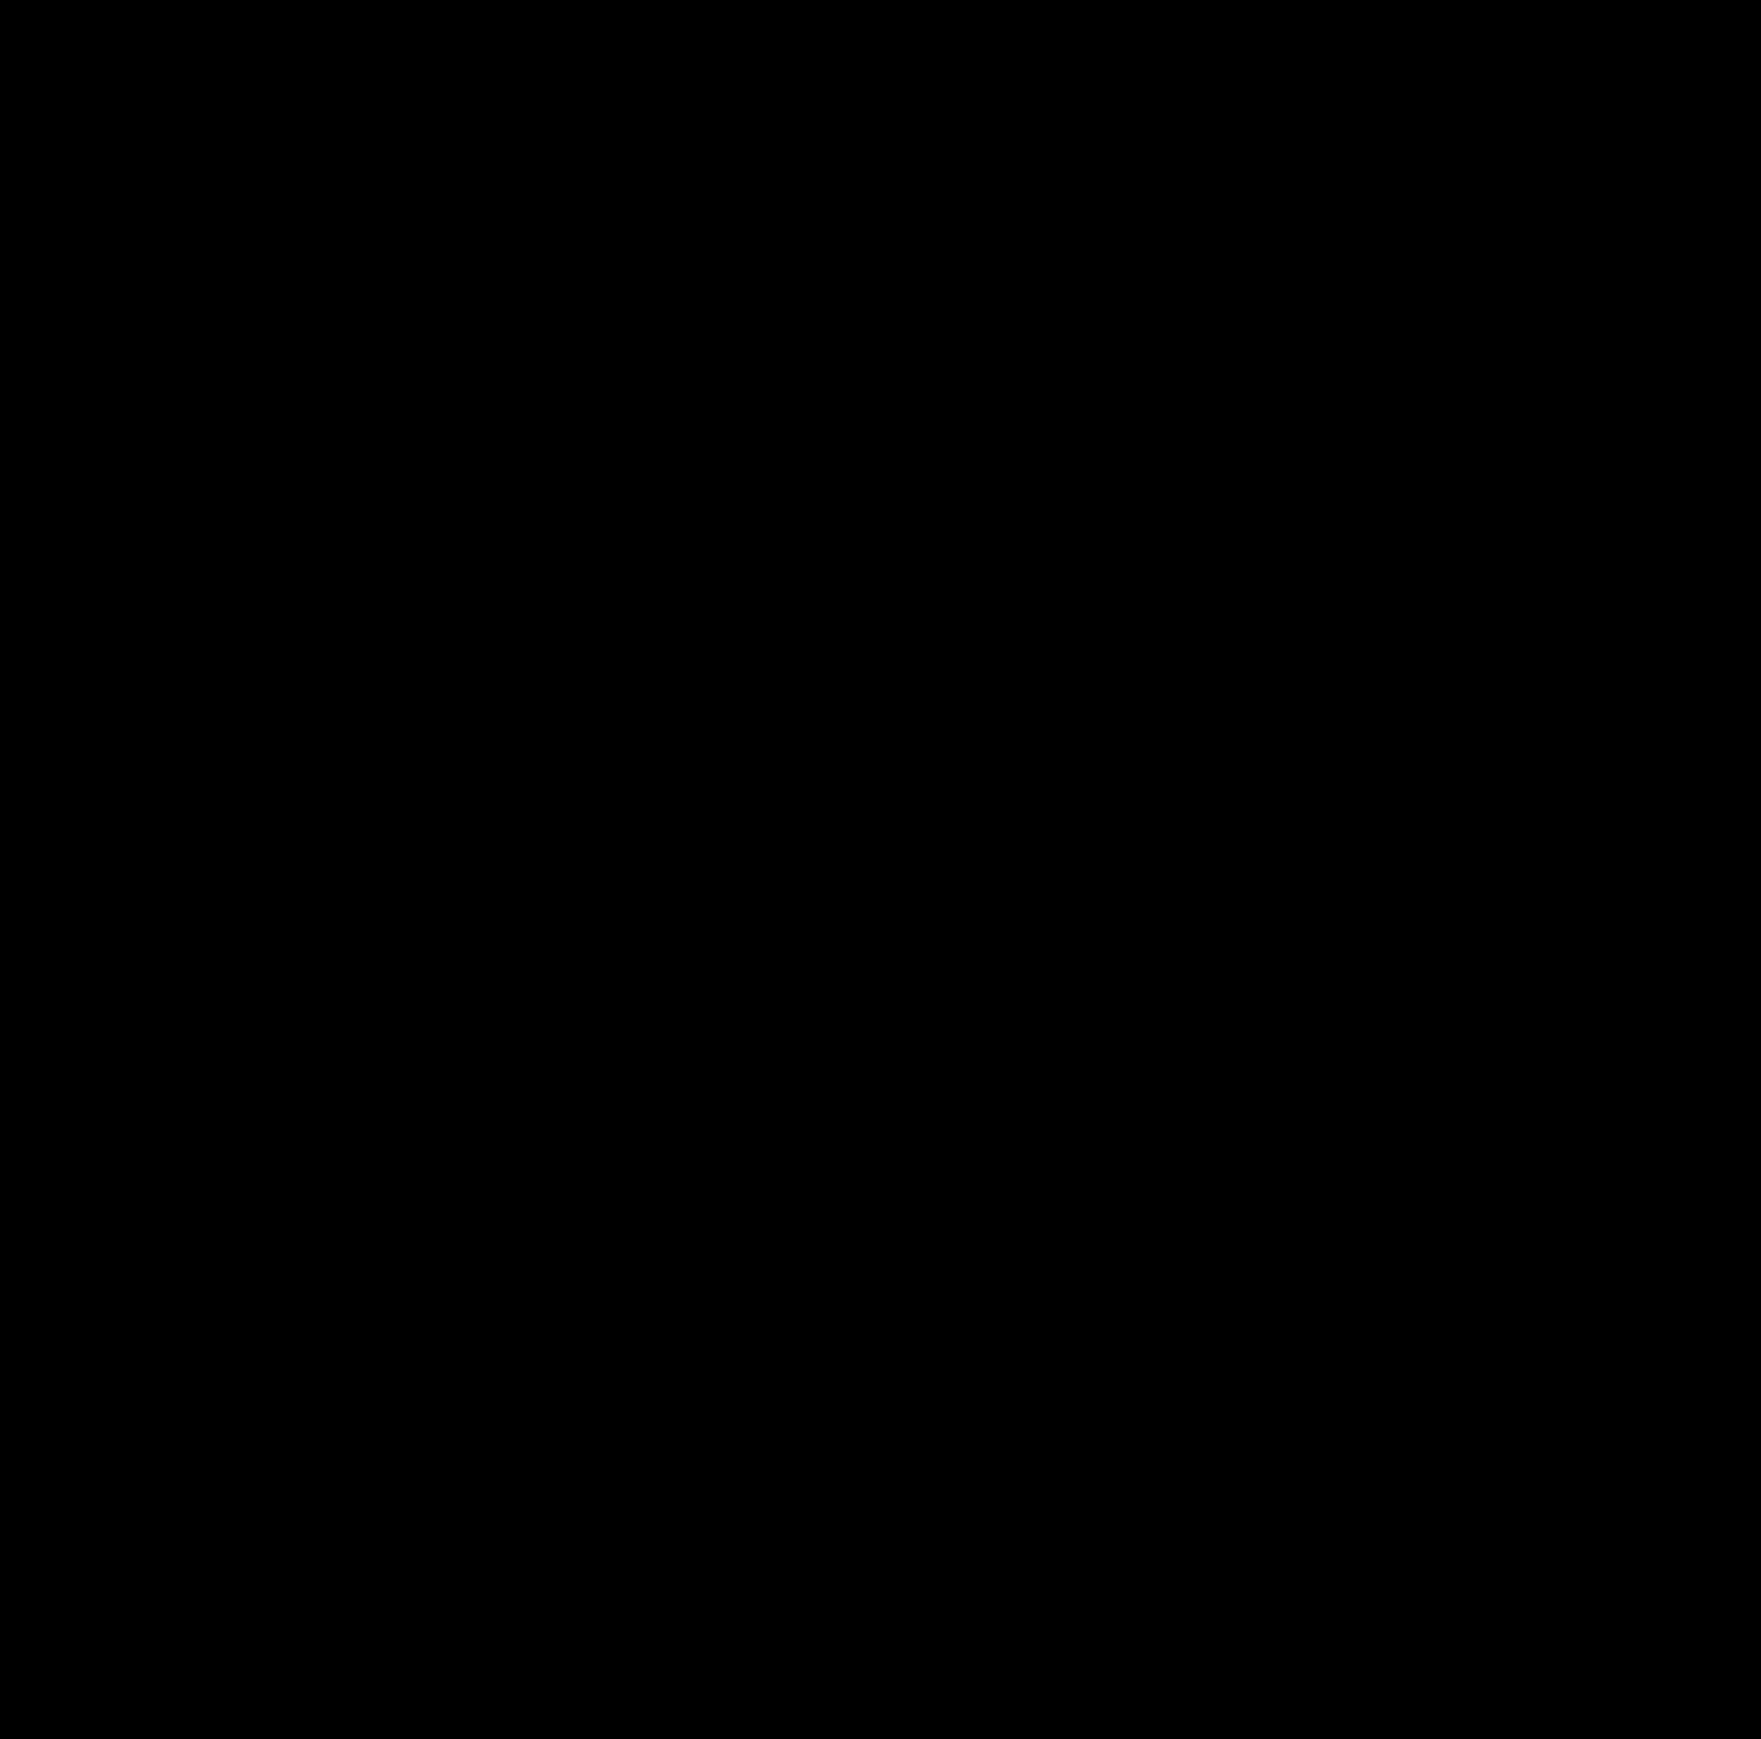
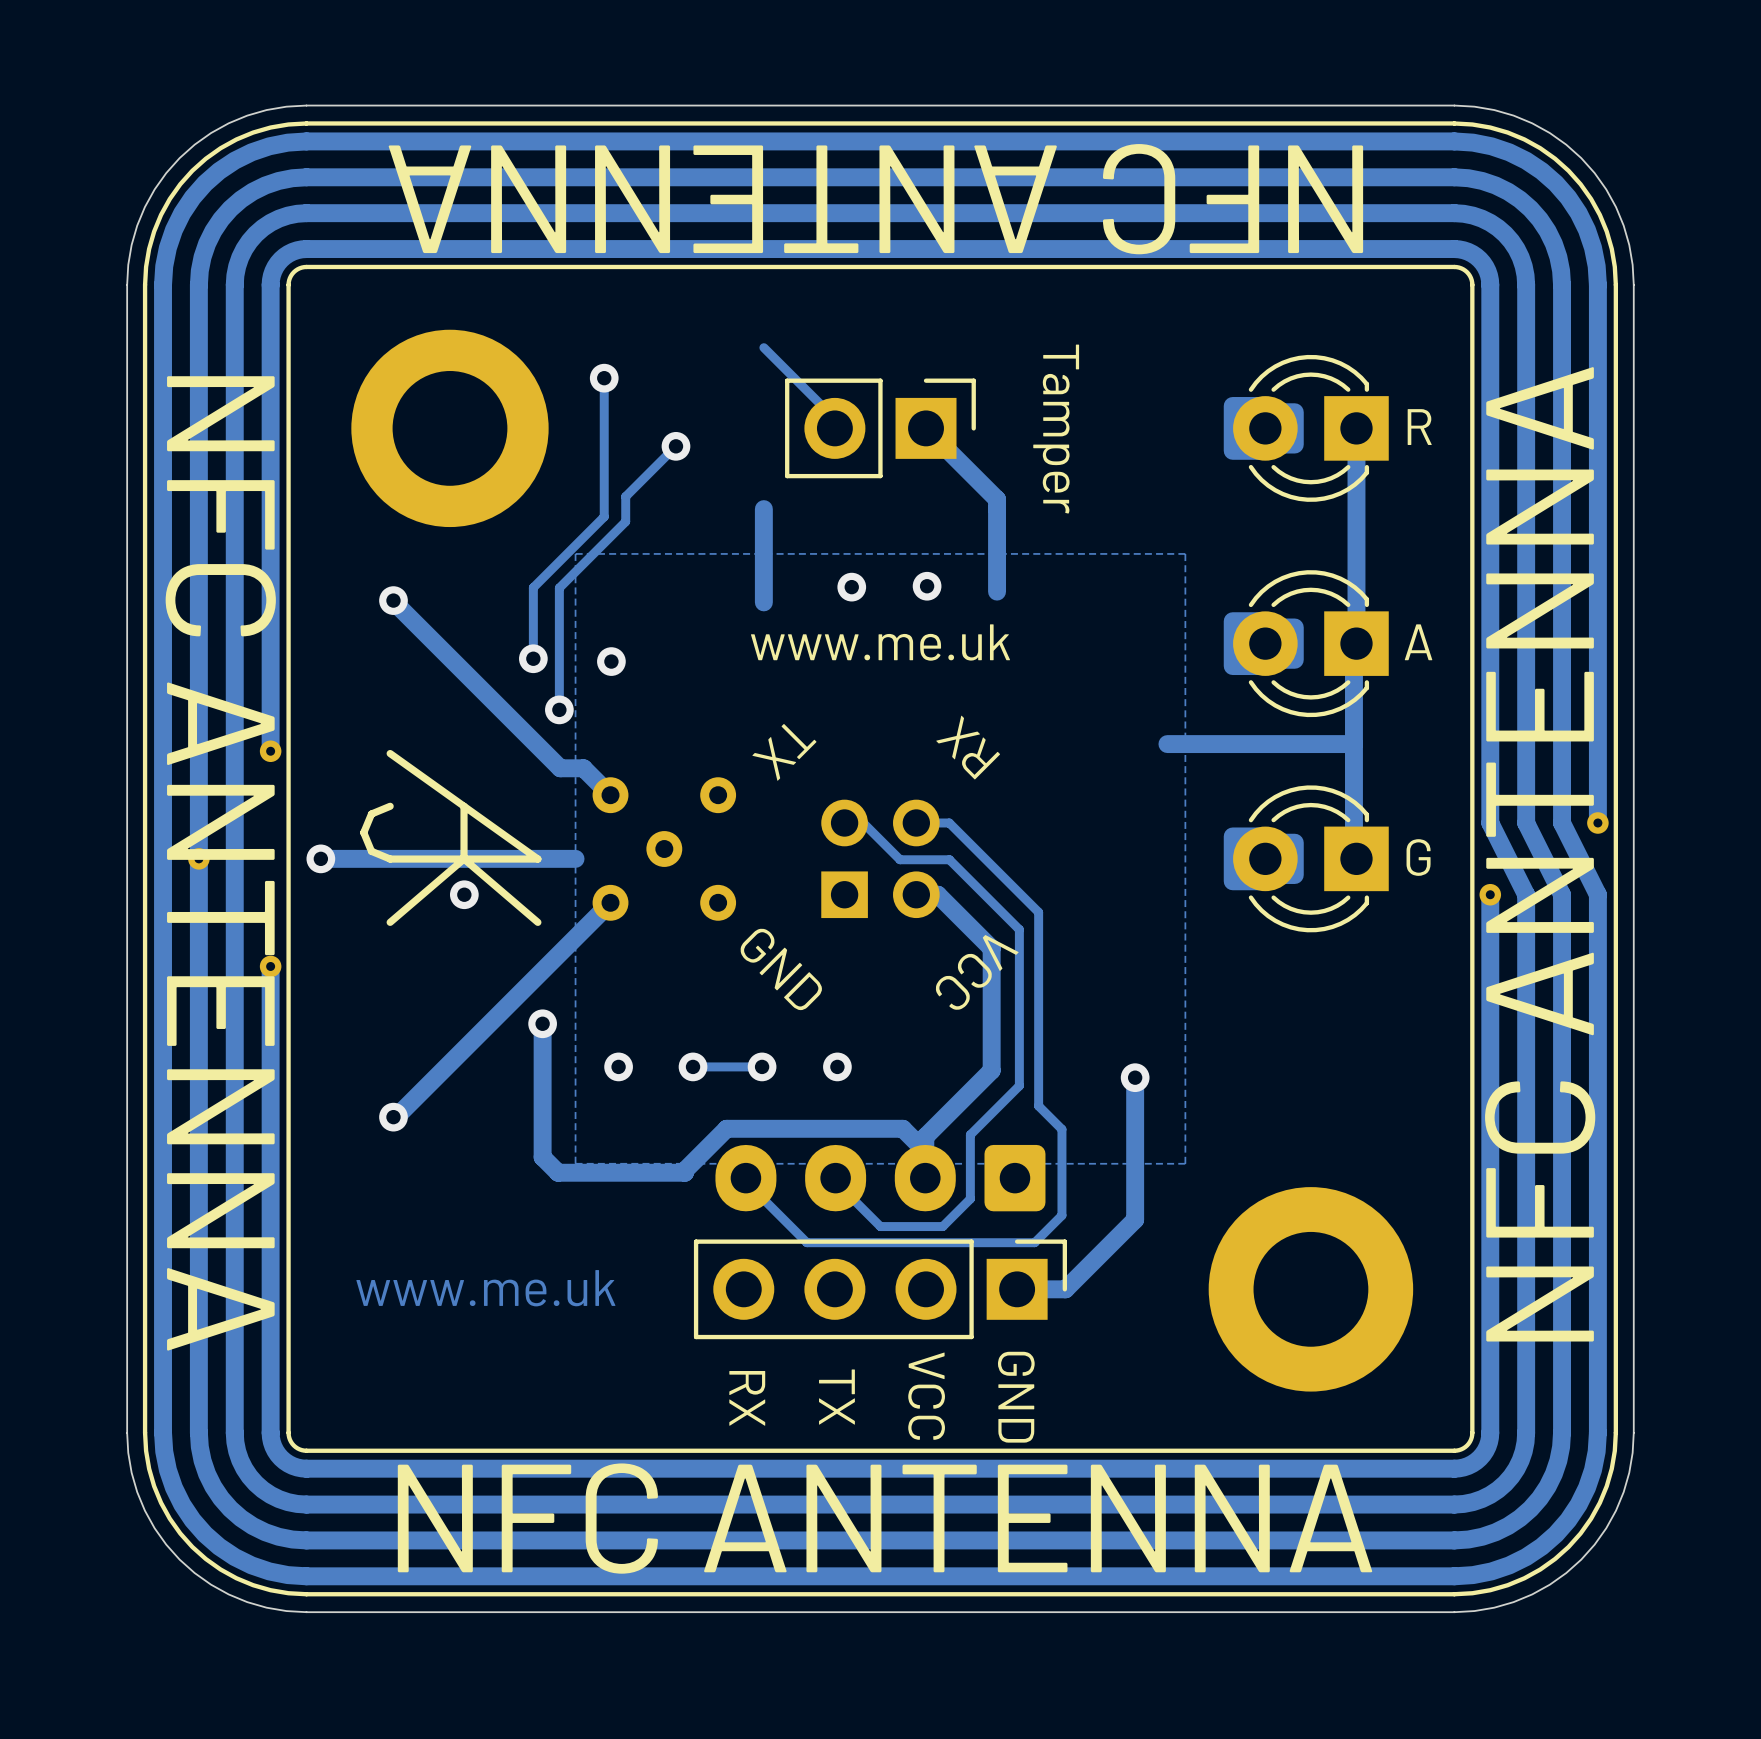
board edge: none -> (1454, 105) (306, 105) (266, 110) (228, 123) (194, 144) (166, 173) (154, 189) (137, 225) (128, 264) (127, 284) (127, 1432) (131, 1472) (144, 1510) (166, 1544) (194, 1573) (228, 1594) (247, 1602) (266, 1607) (306, 1612) (1454, 1612) (1494, 1607) (1532, 1594) (1566, 1573) (1594, 1544) (1616, 1510) (1623, 1492) (1629, 1472) (1633, 1432) (1632, 264) (1629, 244) (1616, 207) (1594, 173) (1581, 158) (1566, 144) (1532, 123) (1494, 110) (1454, 105)
track: none -> (763, 347) (834, 418) (834, 428)
track: none -> (604, 378) (604, 516) (533, 587) (533, 658)
via: none -> (604, 378)
text: none -> R (1419, 427)
part: none -> (449, 428)
part: none -> (880, 428)
track: none -> (926, 428) (997, 499) (997, 591)
text: none -> Tamper (1056, 429)
part: none -> (1306, 428)
track: none -> (1356, 428) (1356, 643)
track: none -> (675, 446) (625, 496) (625, 521) (559, 588) (559, 709)
via: none -> (675, 446)
track: none -> (763, 509) (763, 602)
zone outline: none -> (1185, 553) (1185, 1163) (575, 1163) (575, 553) (1185, 553)
via: none -> (927, 586)
via: none -> (851, 587)
track: none -> (393, 600) (560, 768) (583, 768) (610, 795)
via: none -> (393, 600)
text: none -> www.me.uk (880, 642)
text: none -> A (1418, 642)
part: none -> (1306, 643)
track: none -> (1353, 643) (1353, 856) (1356, 858)
via: none -> (533, 658)
via: none -> (611, 661)
via: none -> (559, 709)
track: none -> (1353, 744) (1167, 744)
text: none -> RX (968, 747)
drawing: none -> [360, 749, 542, 926]
text: none -> TX (784, 752)
track: none -> (844, 822) (863, 822) (900, 859) (949, 859) (1019, 929) (1019, 1085) (970, 1134) (970, 1198) (942, 1226) (880, 1226) (835, 1181)
track: none -> (916, 822) (949, 822) (1038, 912) (1038, 1106) (1061, 1129) (1061, 1215) (1034, 1242) (806, 1242) (745, 1181)
part: none -> (664, 849)
text: none -> G (1418, 857)
via: none -> (320, 858)
track: none -> (575, 858) (320, 858)
part: none -> (880, 858)
part: none -> (880, 858)
part: none -> (1306, 858)
via: none -> (464, 894)
track: none -> (916, 894) (937, 894) (991, 948) (991, 1070) (925, 1136) (925, 1178)
track: none -> (610, 902) (396, 1117) (393, 1117)
text: none -> GND (781, 969)
text: none -> VCC (977, 972)
track: none -> (542, 1023) (542, 1157) (558, 1172) (684, 1172) (684, 1170) (726, 1128) (902, 1128) (925, 1151)
via: none -> (542, 1023)
via: none -> (618, 1066)
via: none -> (693, 1066)
track: none -> (762, 1066) (693, 1066)
via: none -> (762, 1066)
via: none -> (837, 1066)
track: none -> (1135, 1077) (1135, 1219) (1065, 1289) (1017, 1289)
via: none -> (1135, 1077)
via: none -> (393, 1117)
part: none -> (880, 1178)
text: none -> www.me.uk (485, 1288)
part: none -> (880, 1289)
part: none -> (1310, 1289)
text: none -> VCC (926, 1396)
text: none -> GND (1016, 1397)
text: none -> TX (836, 1397)
text: none -> RX (747, 1398)

